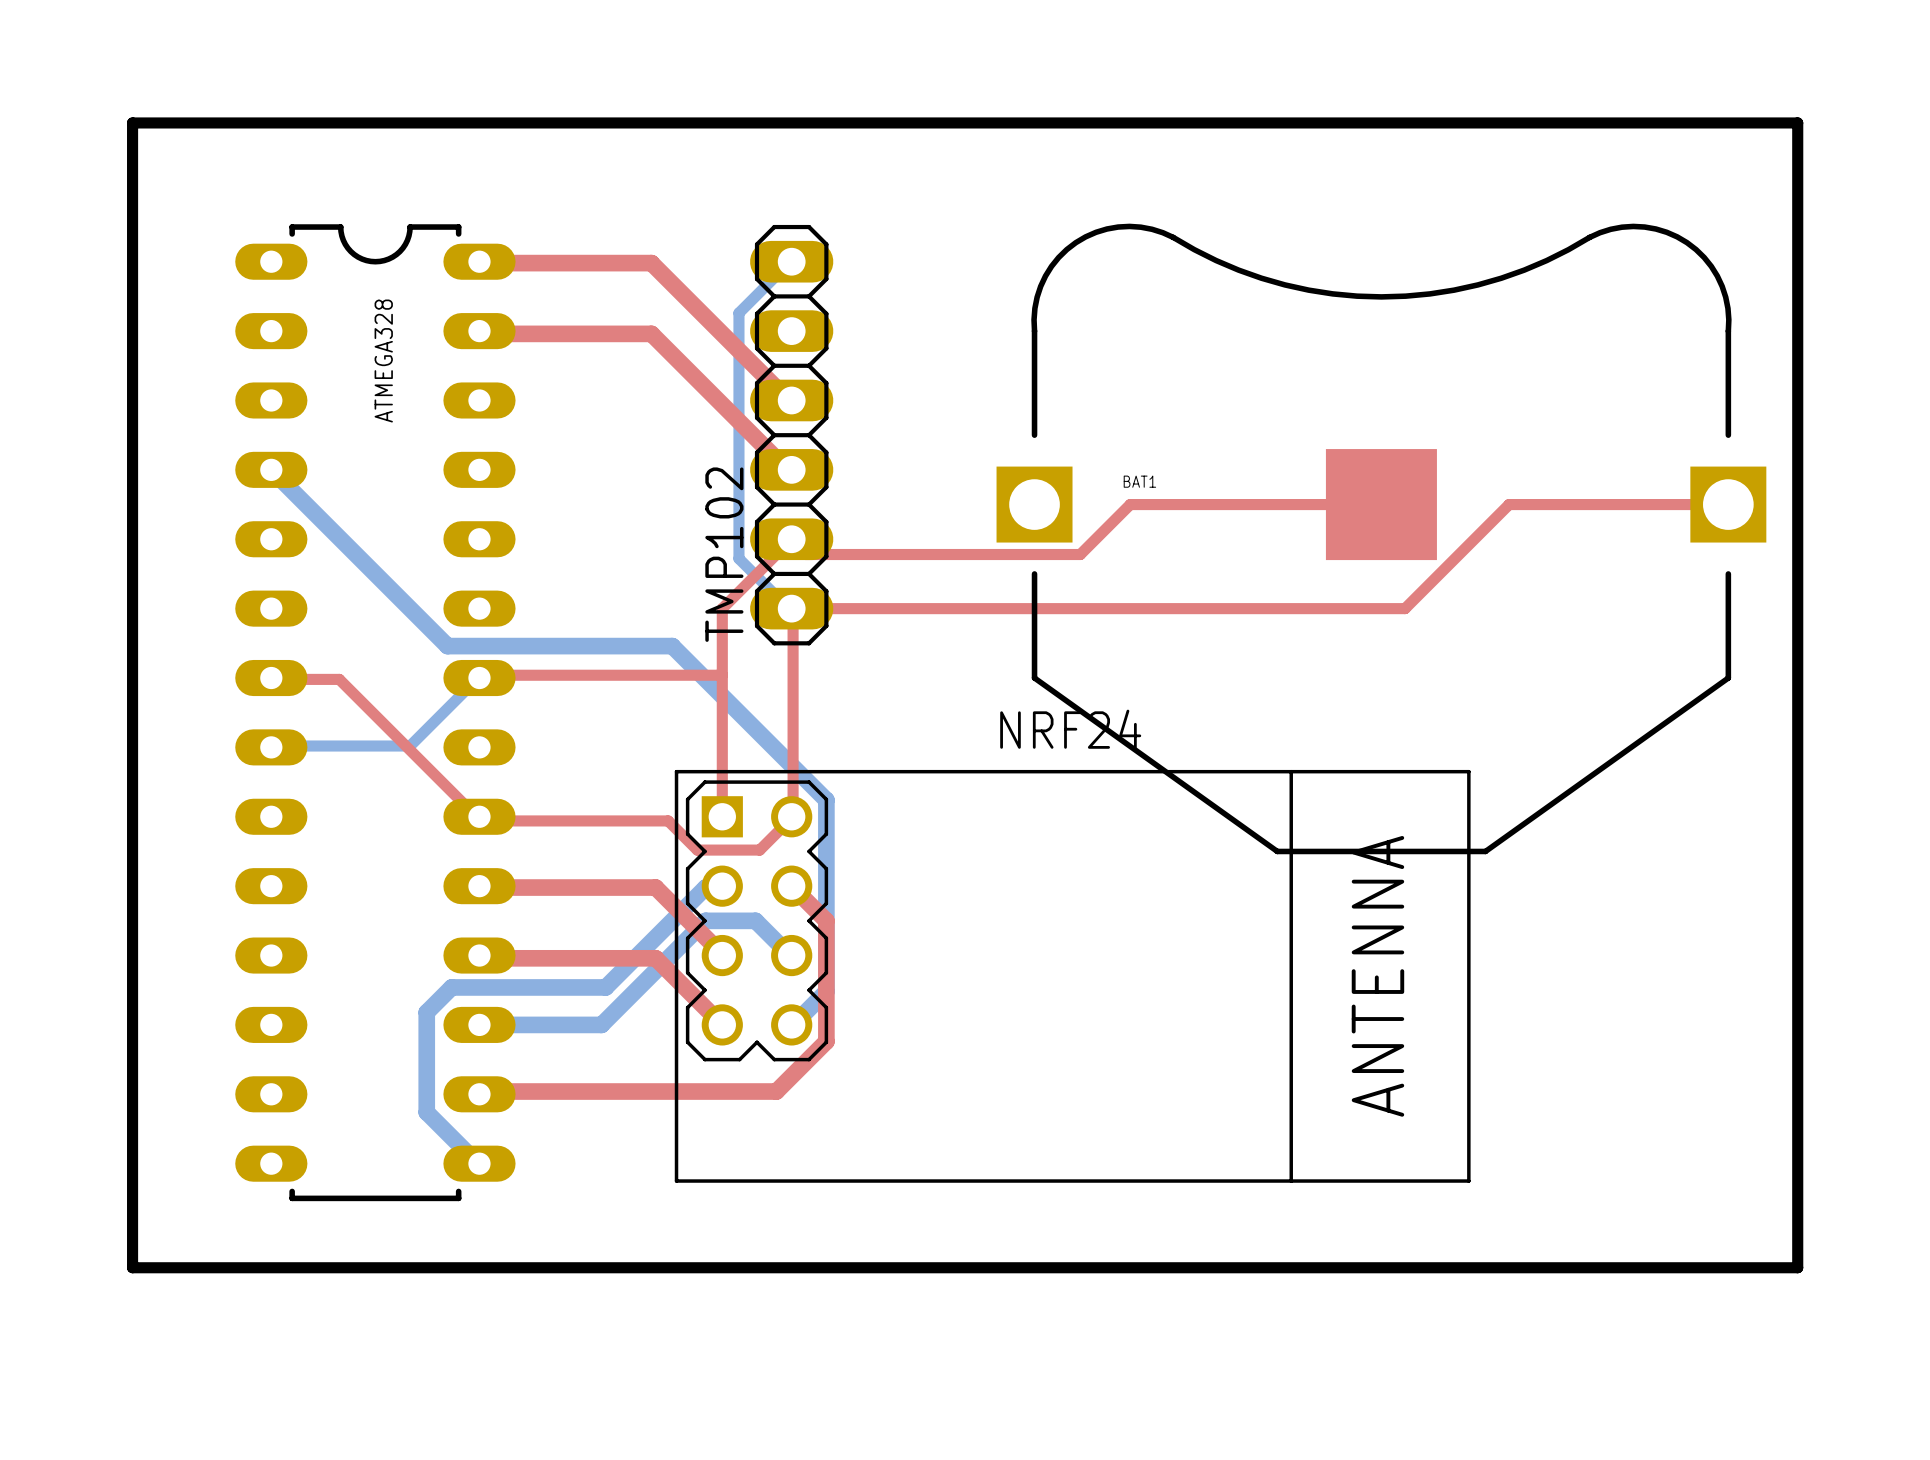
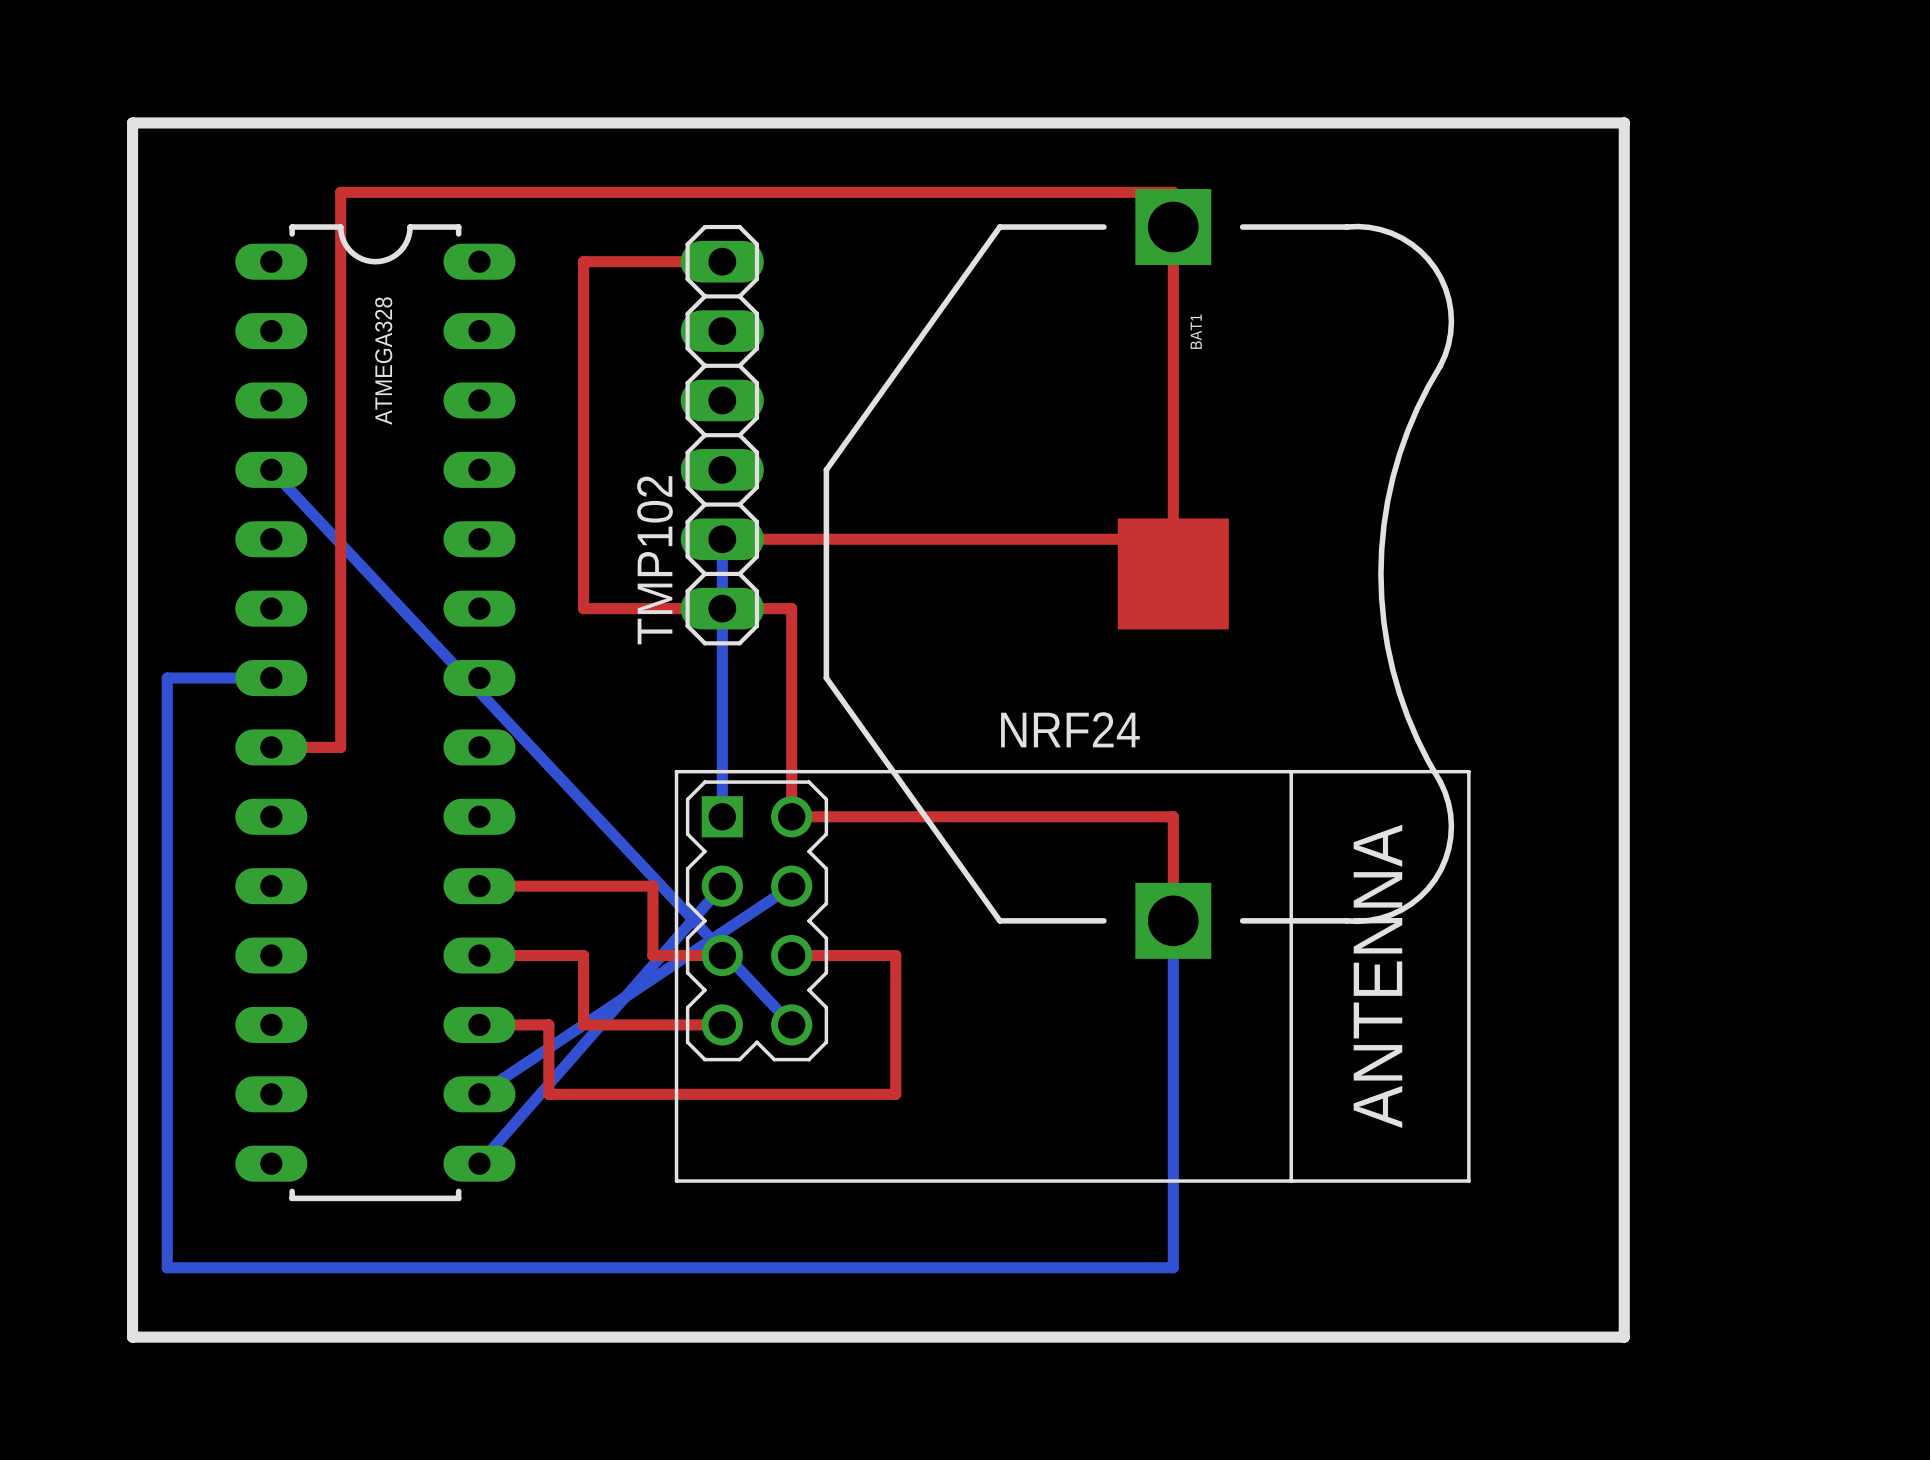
line: (1624, 122) (1797, 122) (1797, 1267) (132, 1267) -> (1624, 122) (1624, 1337) (132, 1337) (132, 1267)
top track: (479, 261) (651, 263) (788, 400) (791, 400) -> none
bottom track: (791, 261) (738, 313) (738, 558) (788, 608) (791, 608) -> none
top track: (479, 331) (480, 333) (651, 333) (788, 471) (791, 469) -> none
TMP102 position: (791, 435) -> (722, 435)
bottom track: (271, 469) (447, 646) (672, 646) (826, 800) (826, 991) (791, 1024) -> (271, 469) (791, 1024)
top track: (1381, 504) (1130, 504) (1080, 554) (805, 554) (791, 539) (722, 608) (722, 816) -> none
top track: (1728, 504) (1509, 504) (1405, 608) (791, 608) -> none
BAT1 rotation: 0° (1381, 538) -> 90° clockwise (1138, 573)
bottom track: none -> (722, 539) (722, 816)
top track: none -> (722, 539) (1173, 539)
top track: none -> (1173, 573) (1173, 192) (340, 192) (340, 747) (271, 747)
top track: (793, 608) (793, 816) -> (1173, 920) (1173, 816) (793, 816)
top track: (722, 675) (480, 675) (479, 678) -> none
bottom track: none -> (271, 678) (167, 678) (167, 1267) (1173, 1267) (1173, 920)
top track: (271, 678) (339, 679) (476, 816) (479, 816) (480, 820) (668, 820) (697, 850) (759, 850) (791, 816) -> (722, 261) (583, 261) (583, 608) (791, 608) (791, 816)
bottom track: (479, 678) (410, 746) (271, 747) -> none
top track: (479, 886) (655, 887) (722, 955) -> (479, 886) (652, 886) (652, 955) (722, 955)
bottom track: (722, 886) (705, 887) (605, 987) (451, 987) (426, 1012) (426, 1112) (479, 1163) -> (722, 886) (479, 1163)
bottom track: none -> (791, 886) (479, 1094)
top track: (791, 886) (826, 920) (826, 1041) (776, 1091) (480, 1091) (479, 1094) -> none
top track: (479, 955) (480, 958) (655, 958) (722, 1024) -> (479, 955) (583, 955) (583, 1024) (722, 1024)
bottom track: (791, 955) (755, 920) (705, 920) (601, 1024) (479, 1024) -> none
top track: none -> (791, 955) (895, 955) (895, 1094) (548, 1094) (548, 1024) (479, 1024)

